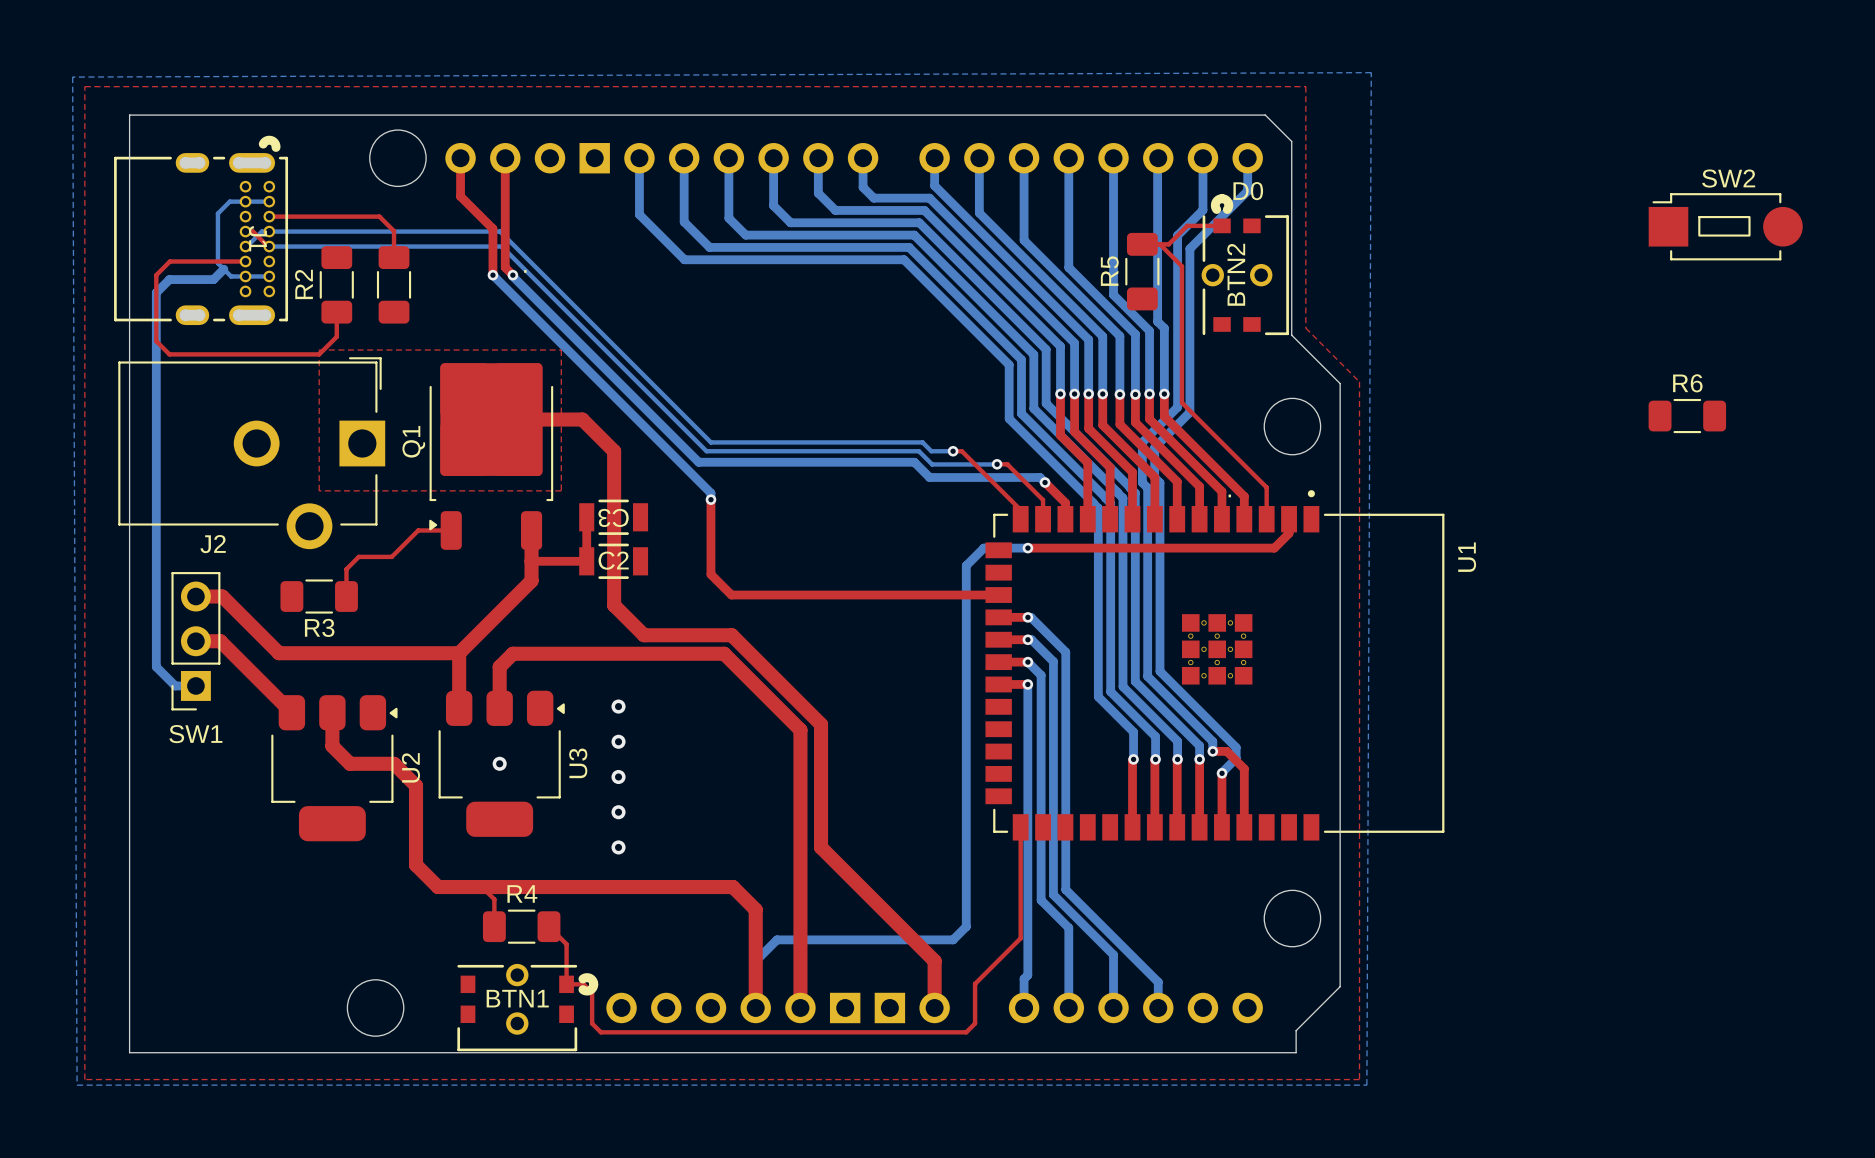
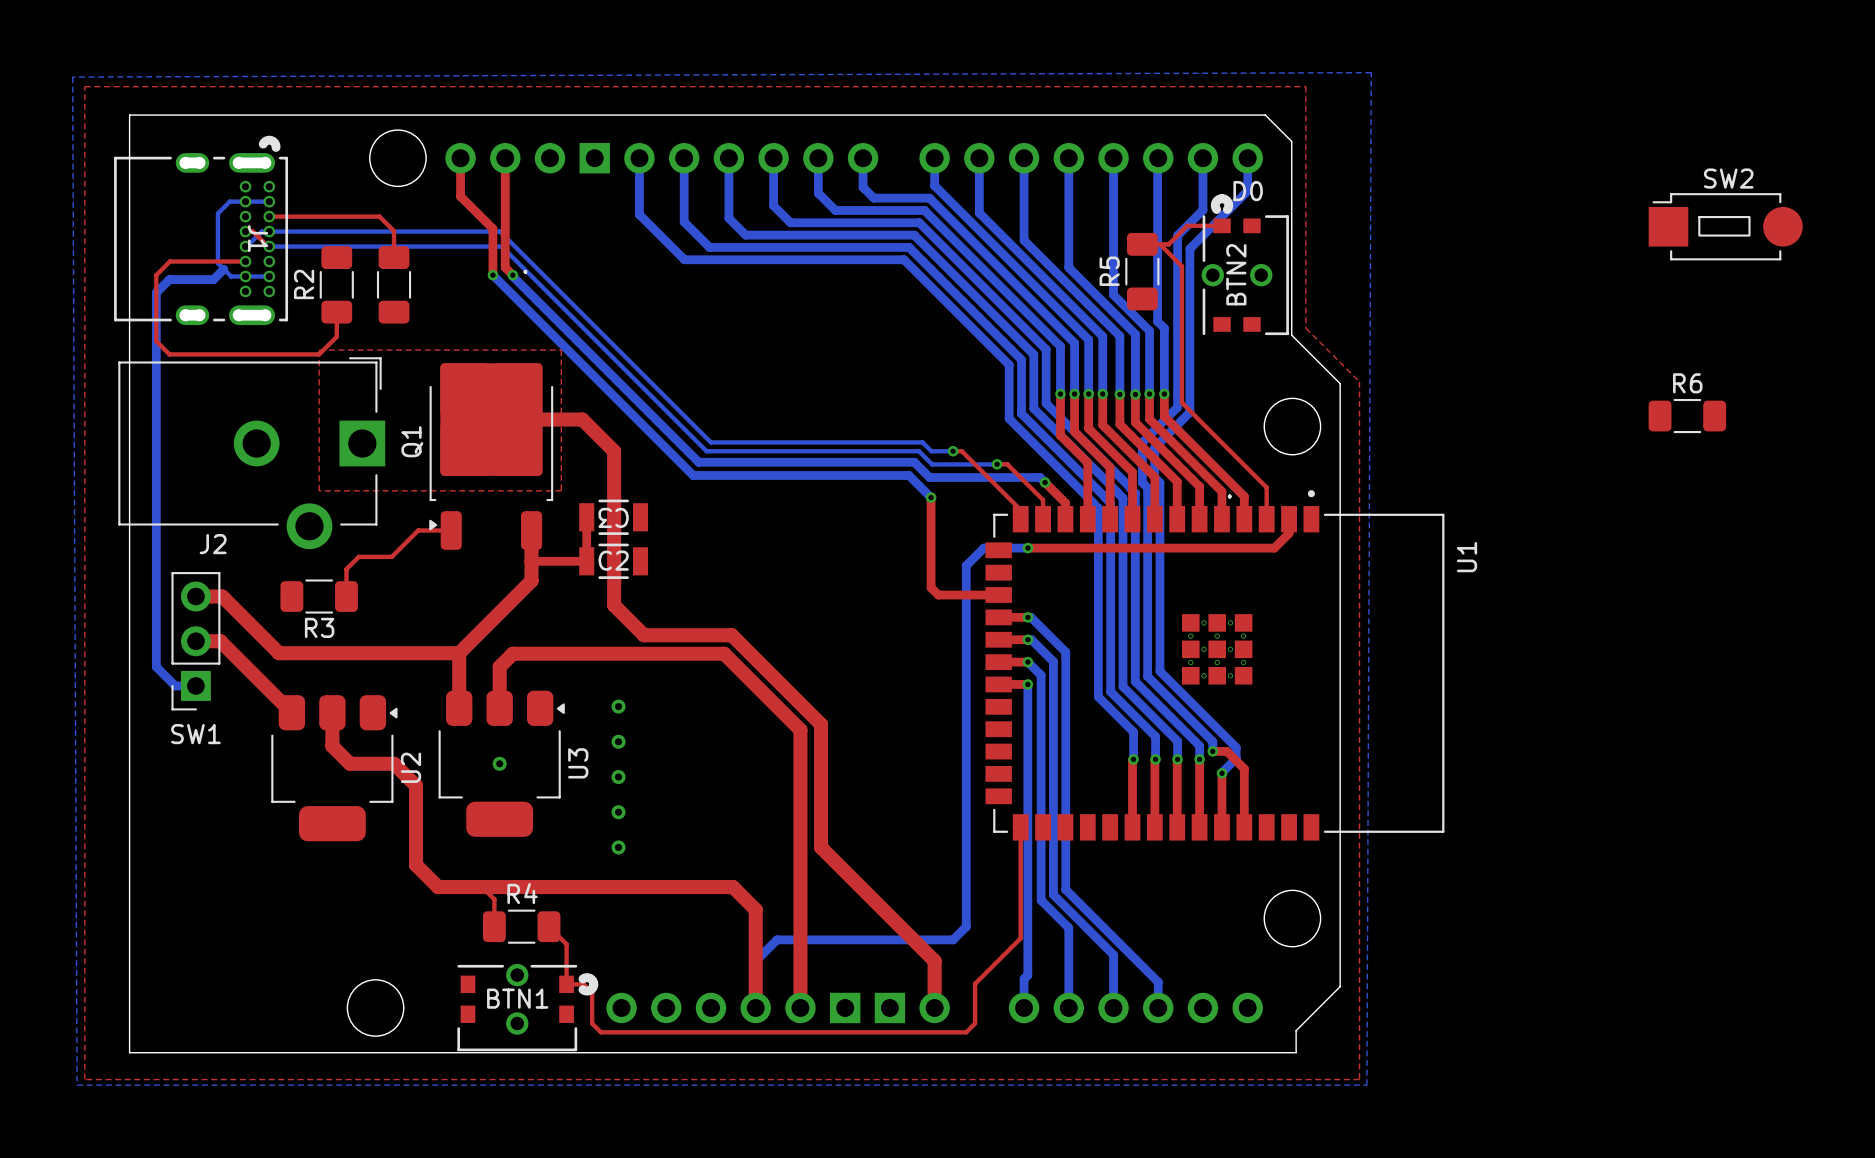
bottom track: (693, 475) (710, 493) (710, 499) -> (693, 475) (908, 475) (931, 497)
via: none -> (931, 497)
top track: (710, 499) (710, 574) (731, 595) (938, 595) -> (931, 497) (931, 587) (938, 595)
via: (710, 499) -> none

